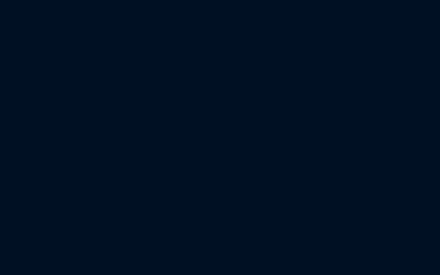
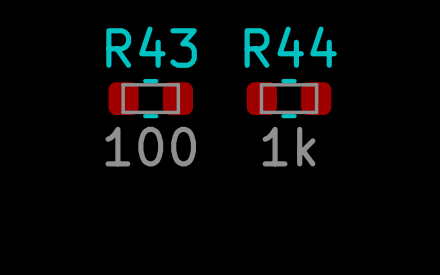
R43: none -> 100 (150, 98)
R44: none -> 1k (289, 98)

